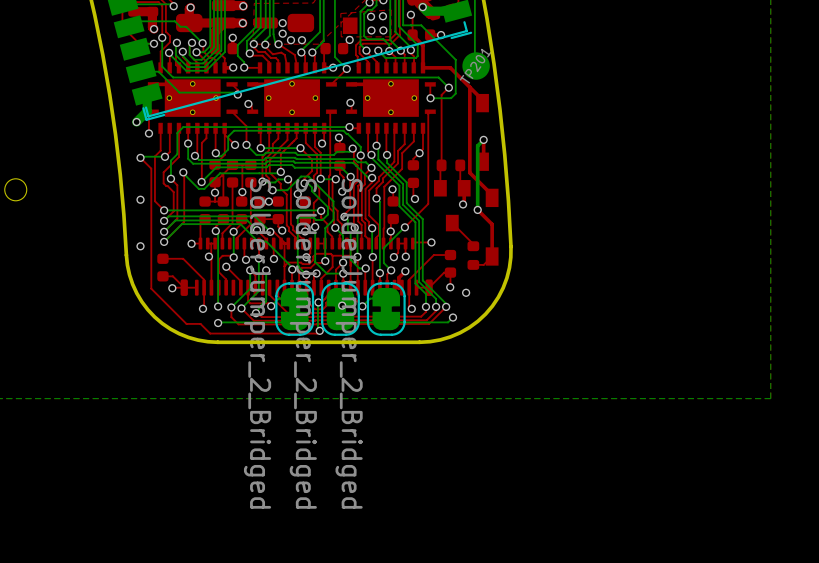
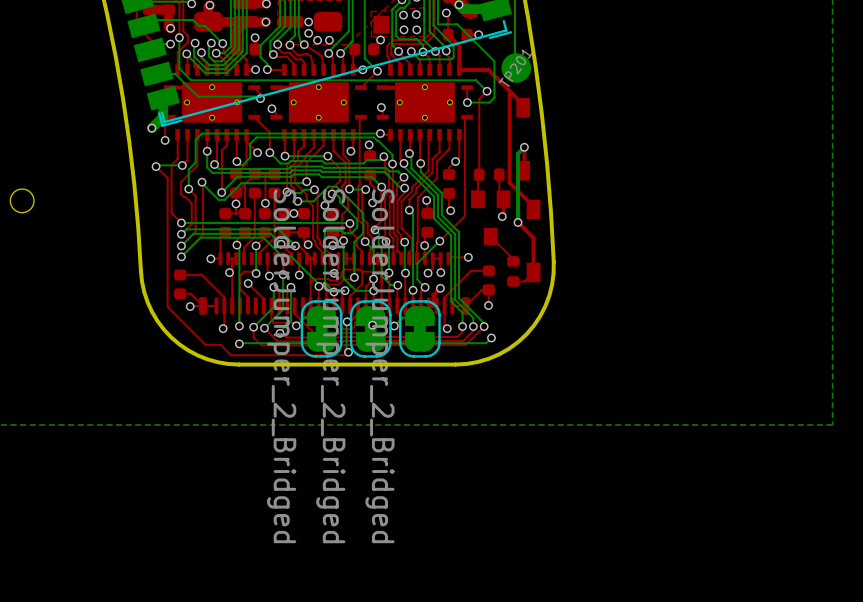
via: (140, 199) -> none
via: (140, 246) -> none
via: (466, 292) -> none

